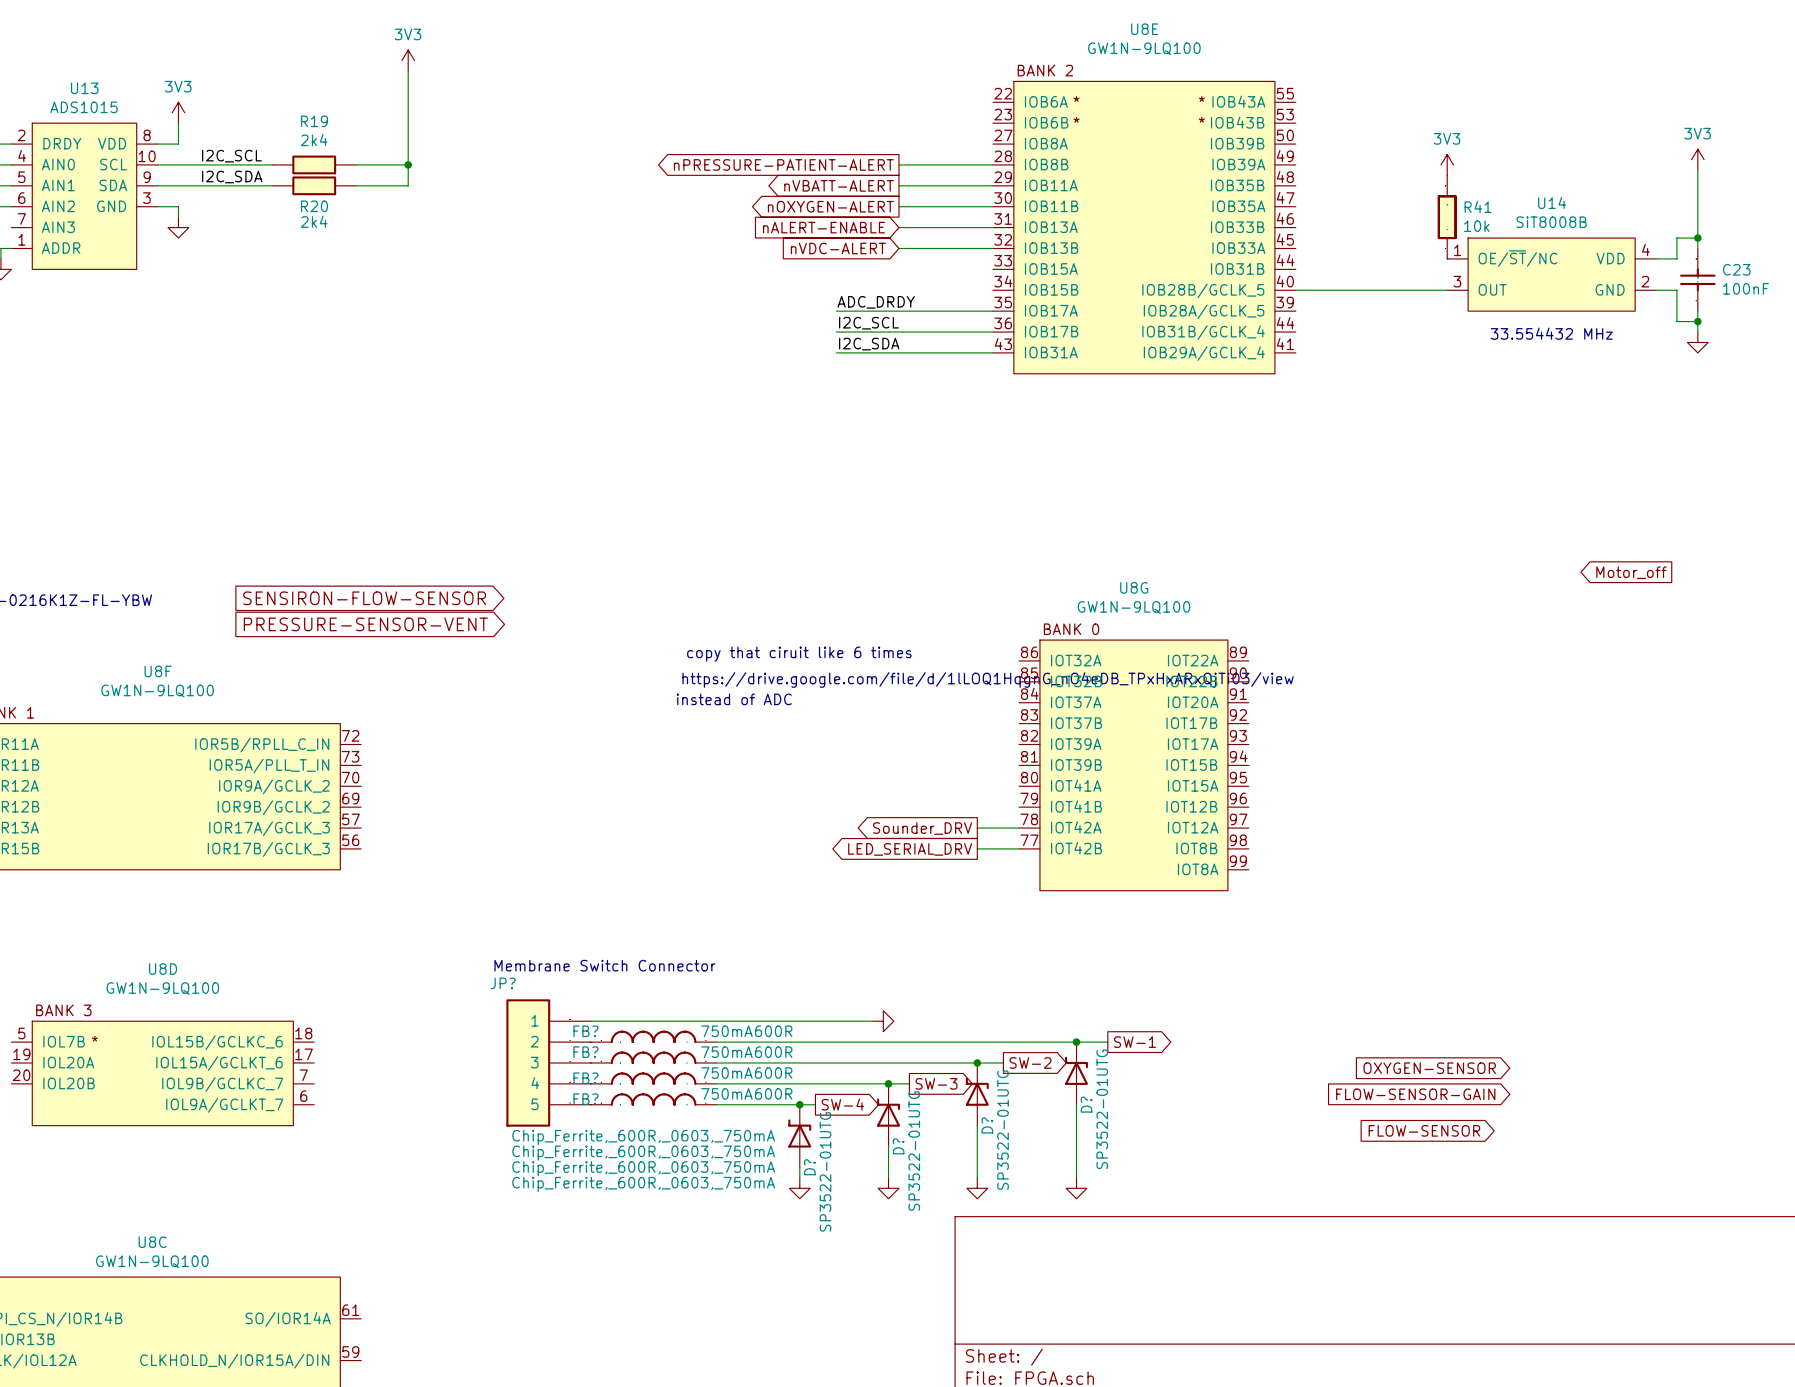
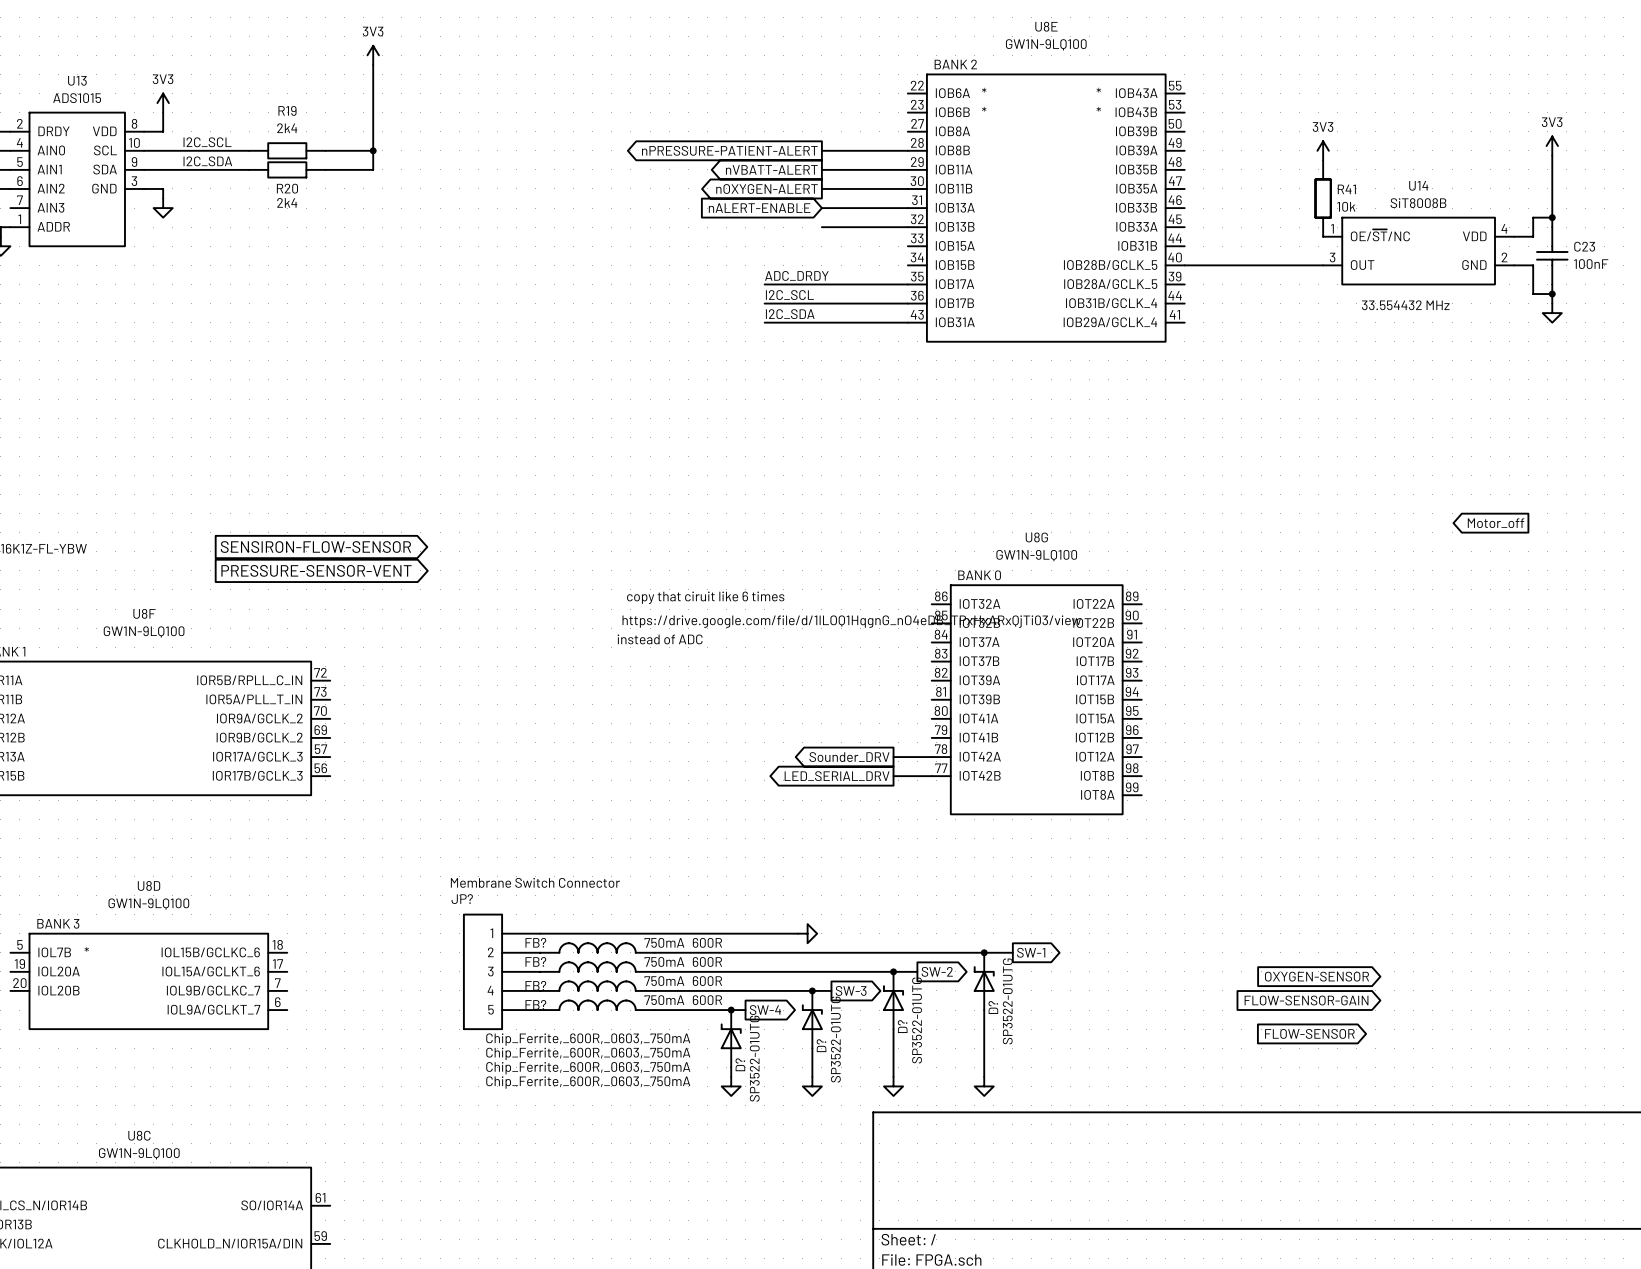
global label: nVDC-ALERT (838, 248) -> none

